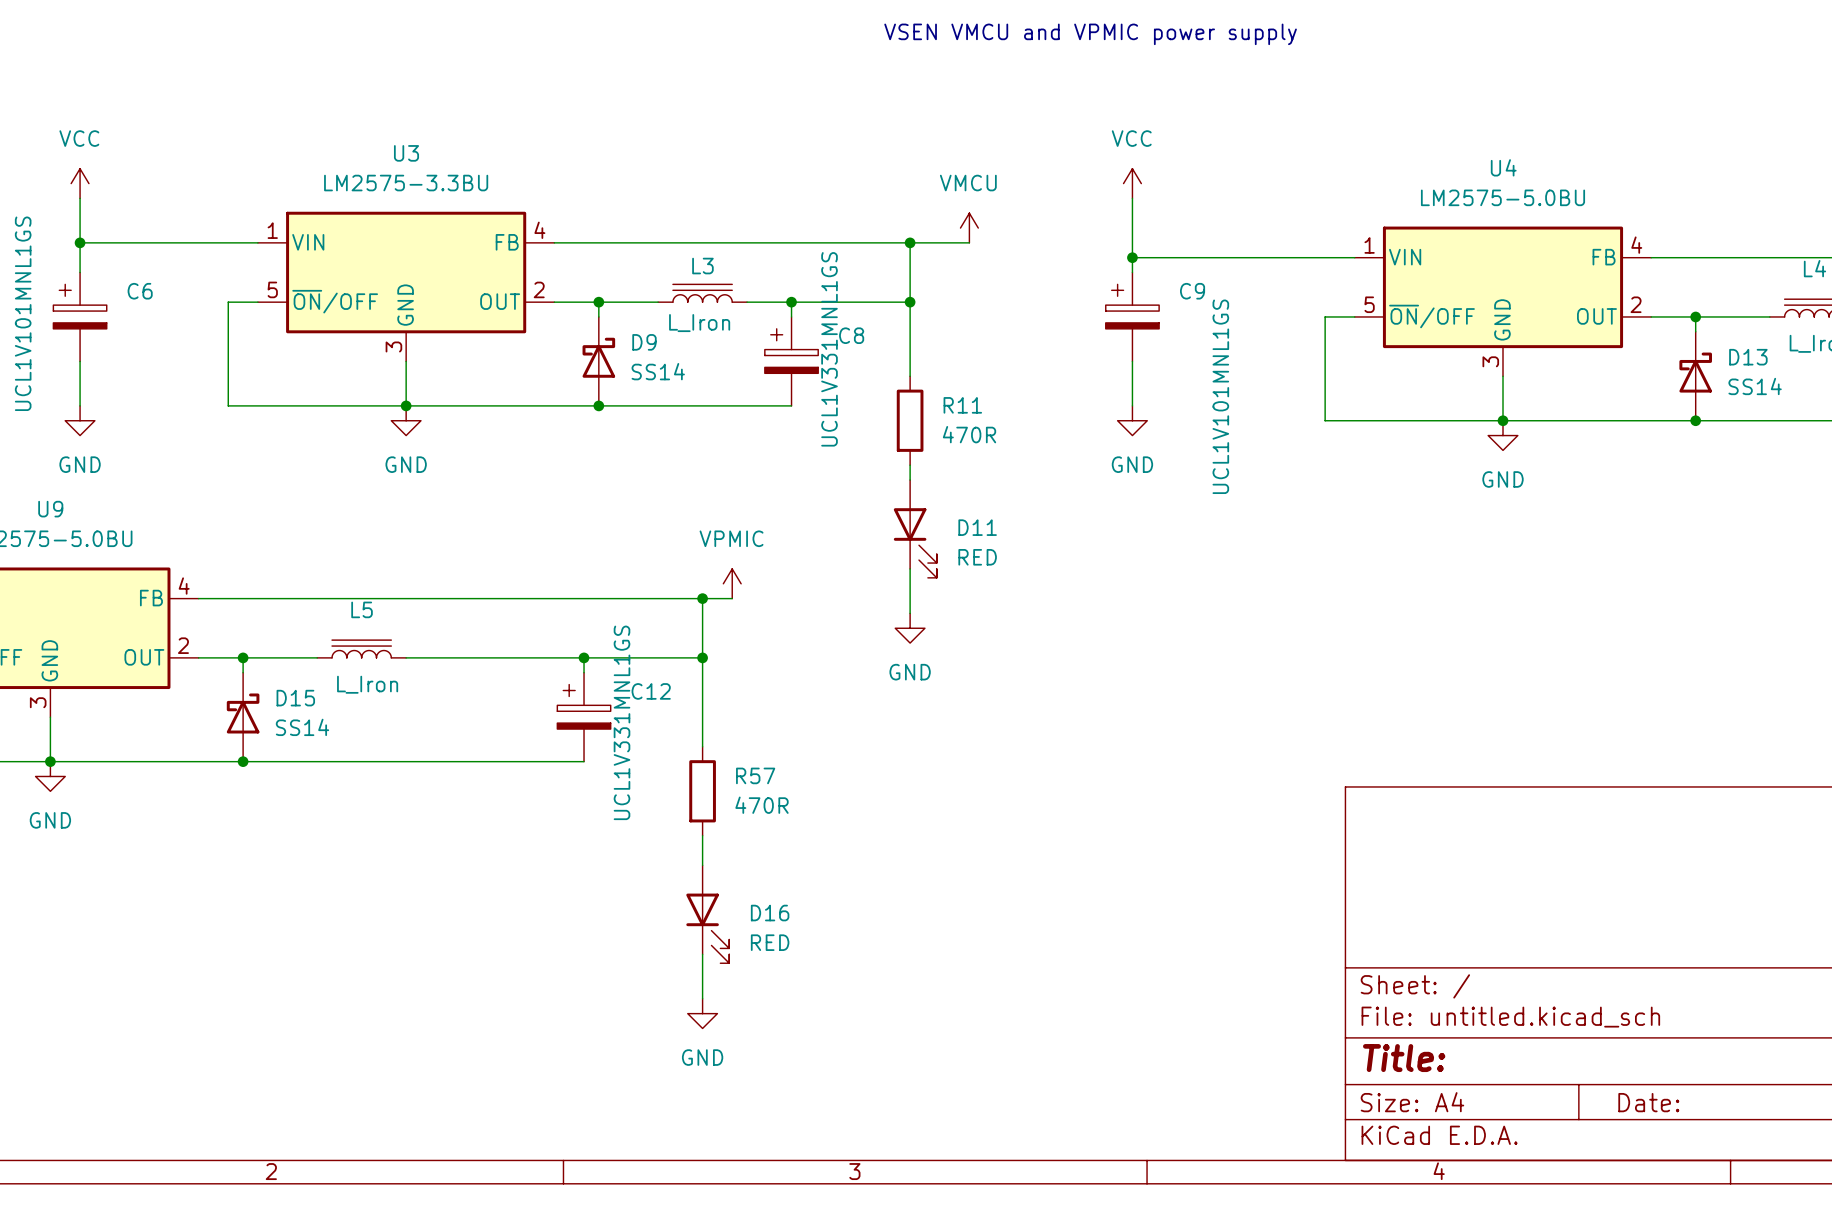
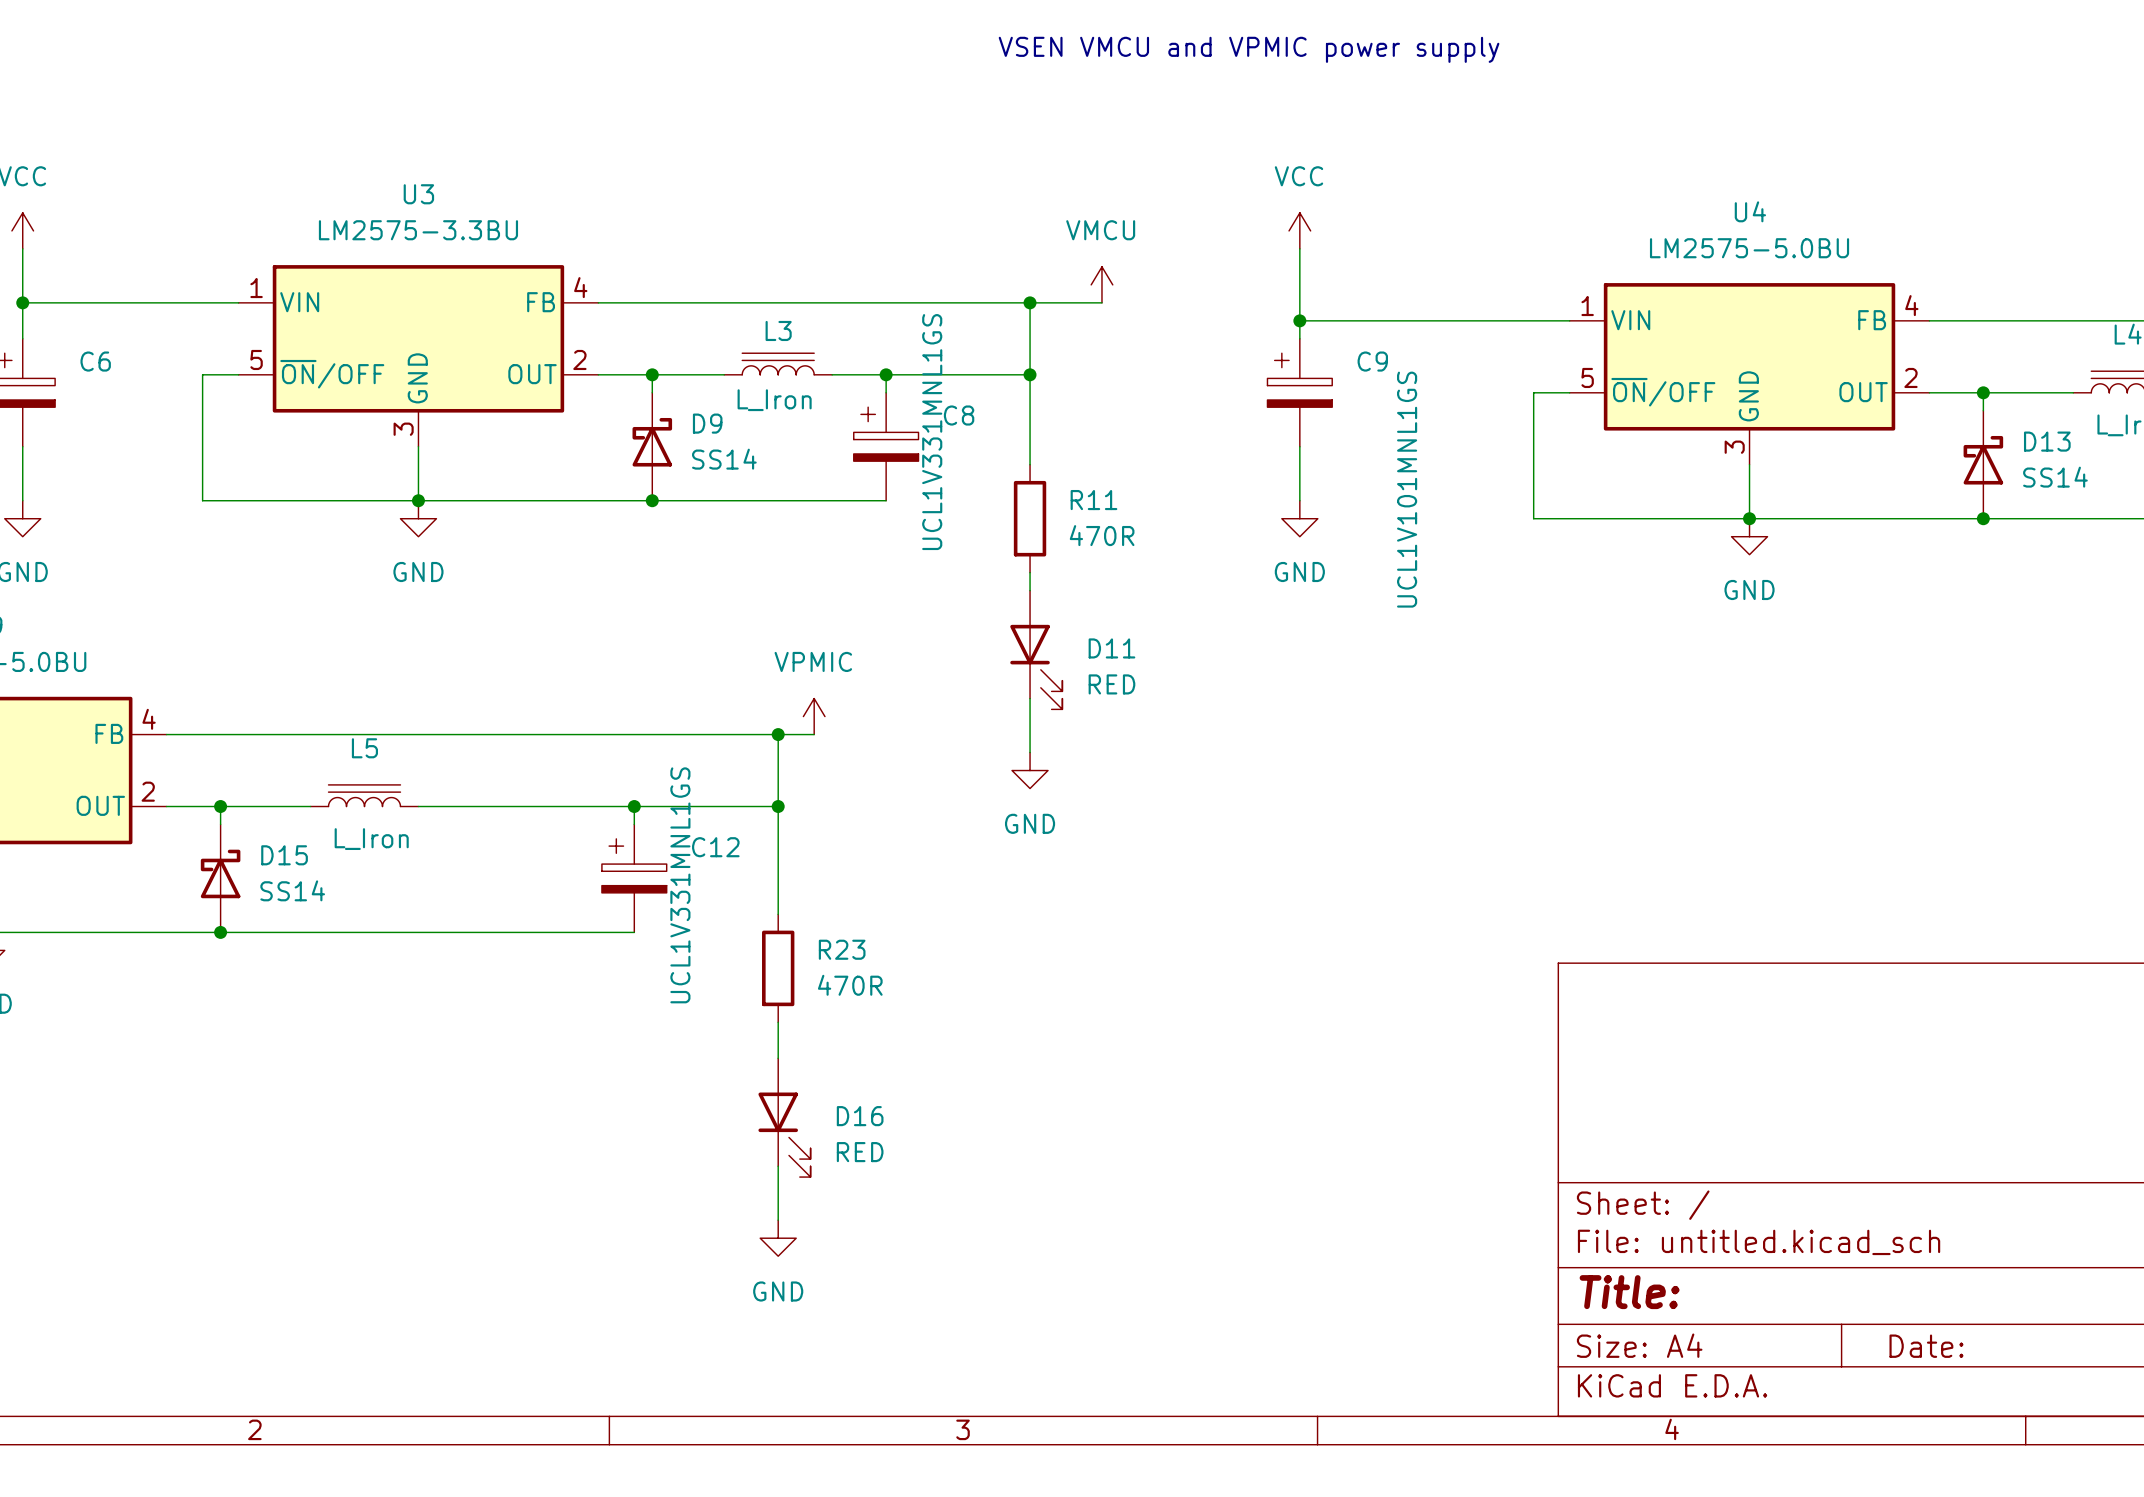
R57 name: R57 (755, 775) -> R23 (842, 949)

